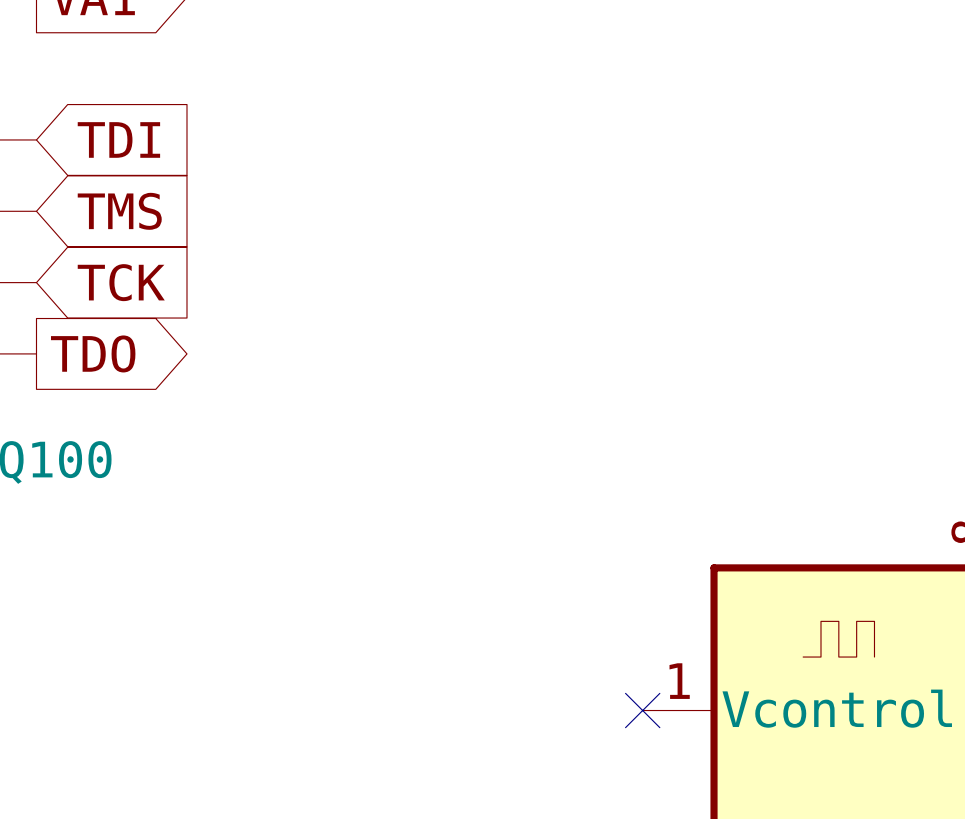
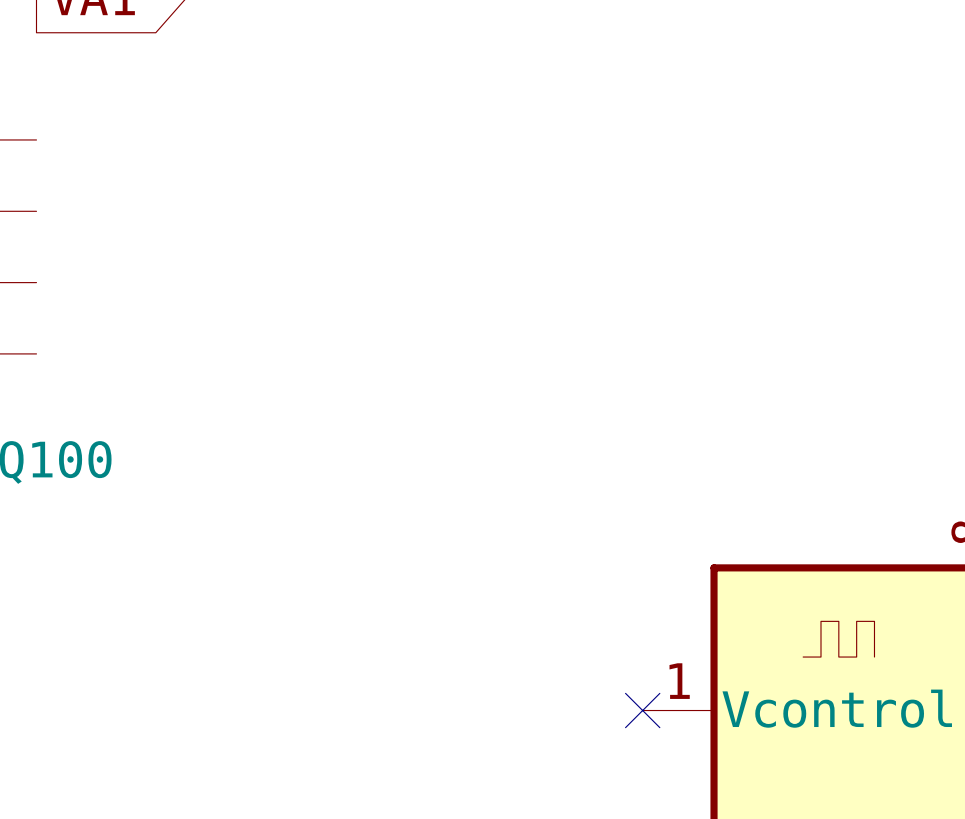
global label: TDI (118, 139) -> none
global label: TMS (119, 211) -> none
global label: TCK (121, 282) -> none
global label: TDO (93, 353) -> none

